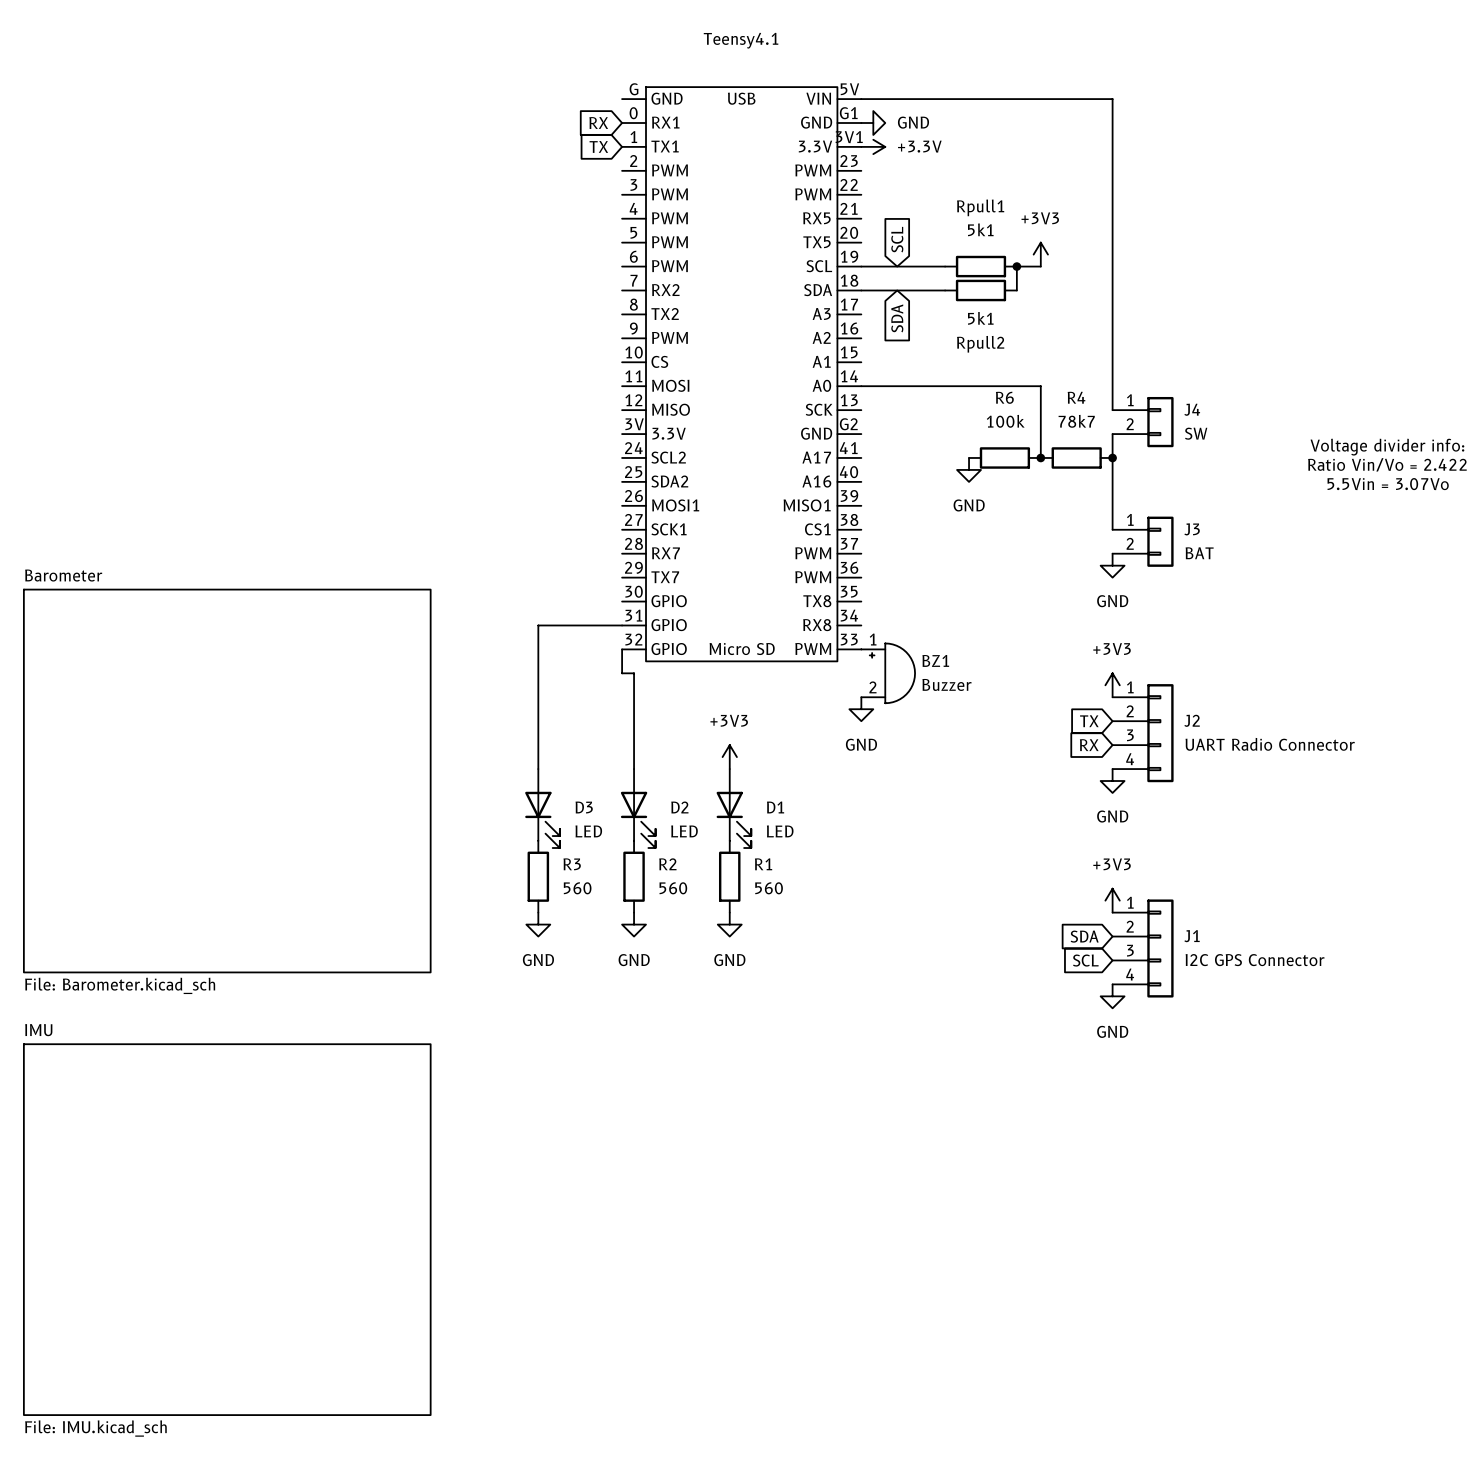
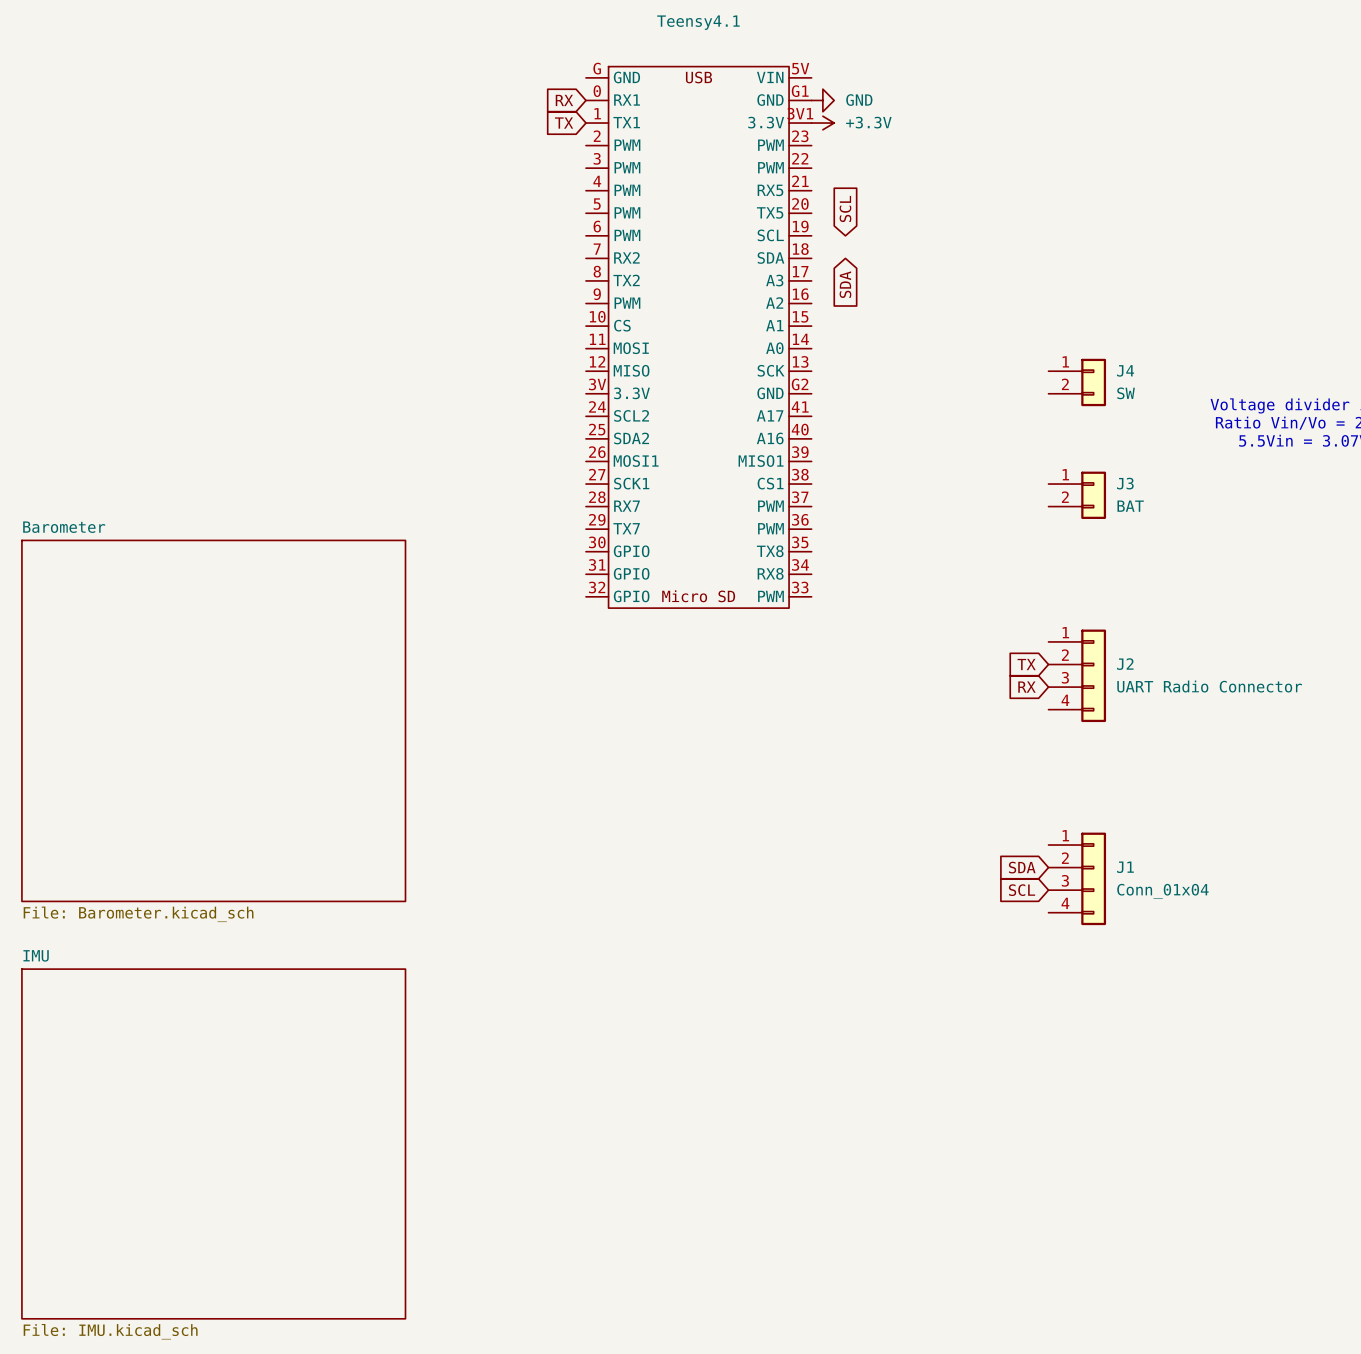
wire: (861, 99) (1112, 99) (1112, 410) -> none
power symbol: +3V3 (1040, 254) -> none
wire: (861, 266) (945, 266) -> none
Rpull1: 5k1 (980, 266) -> none
junction: (1016, 266) -> none
wire: (1040, 266) (1016, 266) (1016, 290) -> none
wire: (861, 290) (945, 290) -> none
Rpull2: 5k1 (980, 290) -> none
wire: (861, 386) (1040, 386) (1040, 457) -> none
wire: (1112, 434) (1112, 529) -> none
R6: 100k (1004, 457) -> none
junction: (1040, 457) -> none
R4: 78k7 (1076, 457) -> none
junction: (1112, 457) -> none
power symbol: GND (969, 469) -> none
power symbol: GND (1112, 565) -> none
wire: (622, 625) (538, 625) (538, 769) -> none
wire: (622, 649) (622, 673) (634, 673) (634, 769) -> none
BZ1: Buzzer (888, 673) -> none
power symbol: +3V3 (1112, 685) -> none
power symbol: GND (861, 709) -> none
power symbol: +3V3 (729, 757) -> none
power symbol: GND (1112, 781) -> none
D3: LED (542, 808) -> none
D2: LED (638, 808) -> none
D1: LED (733, 808) -> none
R3: 560 (538, 876) -> none
R2: 560 (634, 876) -> none
R1: 560 (729, 876) -> none
power symbol: +3V3 (1112, 900) -> none
power symbol: GND (538, 924) -> none
power symbol: GND (634, 924) -> none
power symbol: GND (729, 924) -> none
J1 value: I2C GPS Connector (1255, 960) -> Conn_01x04 (1162, 891)
power symbol: GND (1112, 996) -> none

